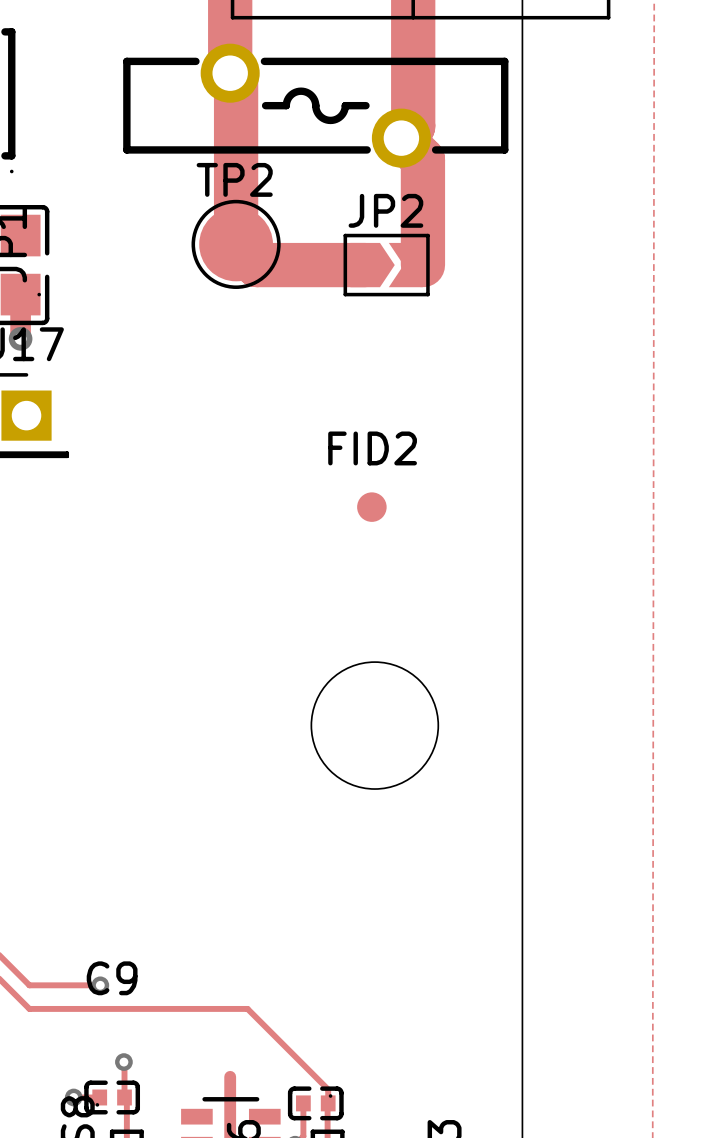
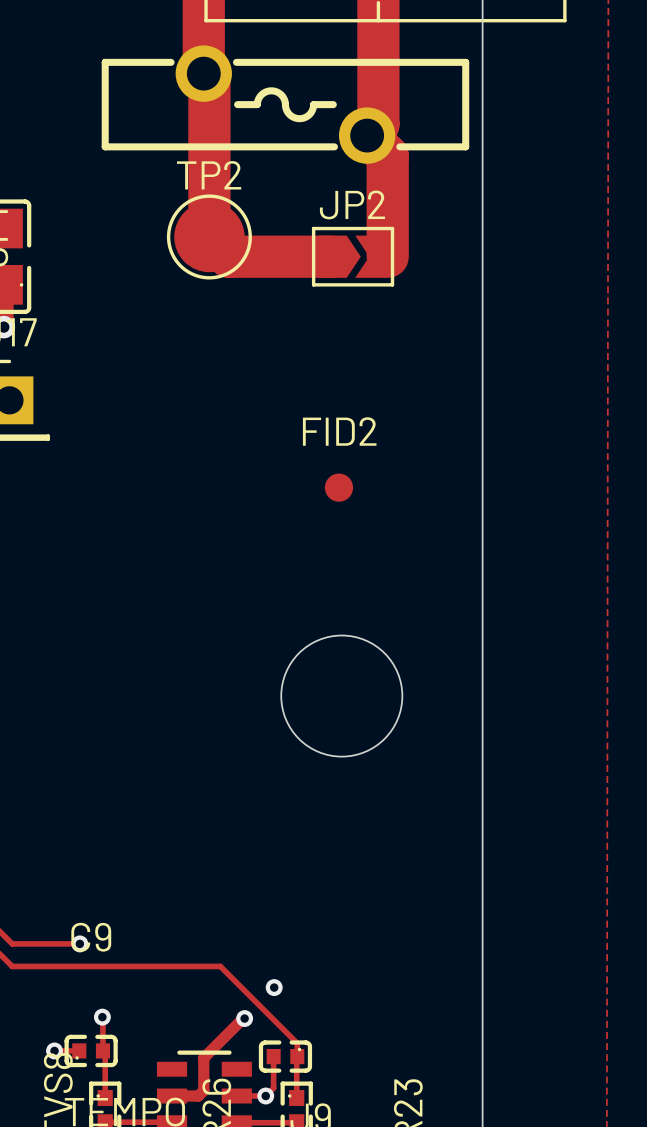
via: none -> (274, 987)
via: none -> (244, 1018)
track: (230, 1076) (230, 1104) -> (244, 1018) (203, 1057)

